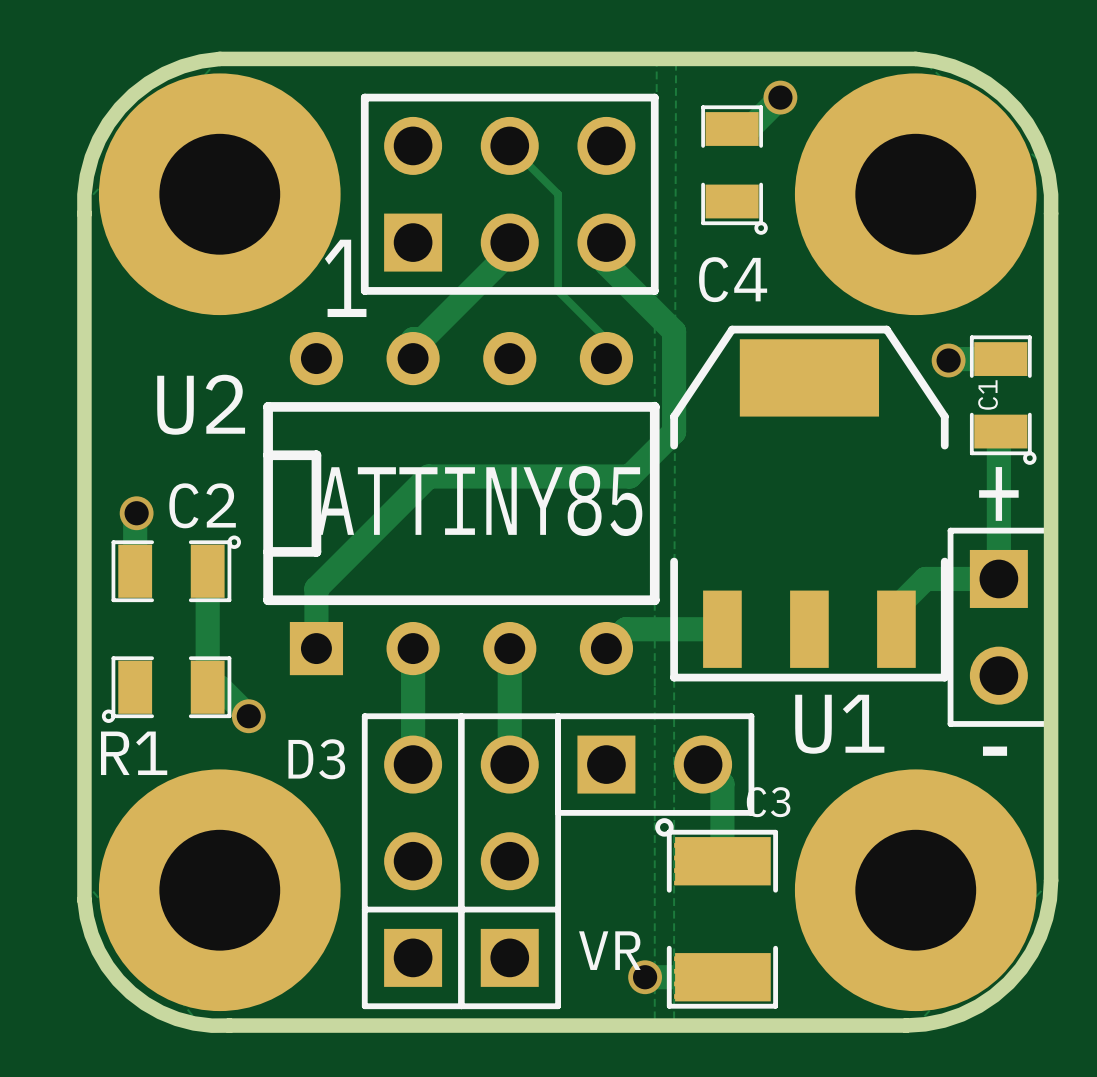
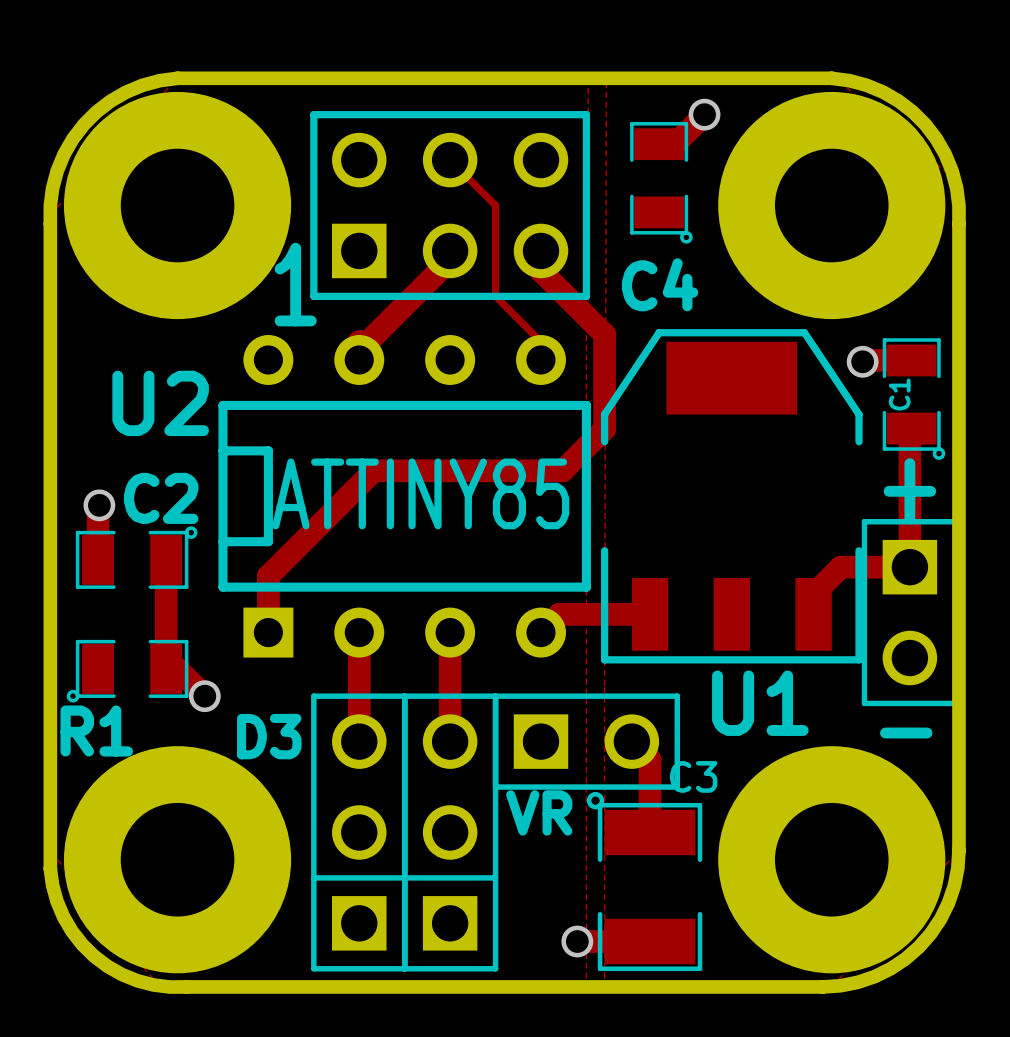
text position: VR (609, 950) -> VR (539, 812)

